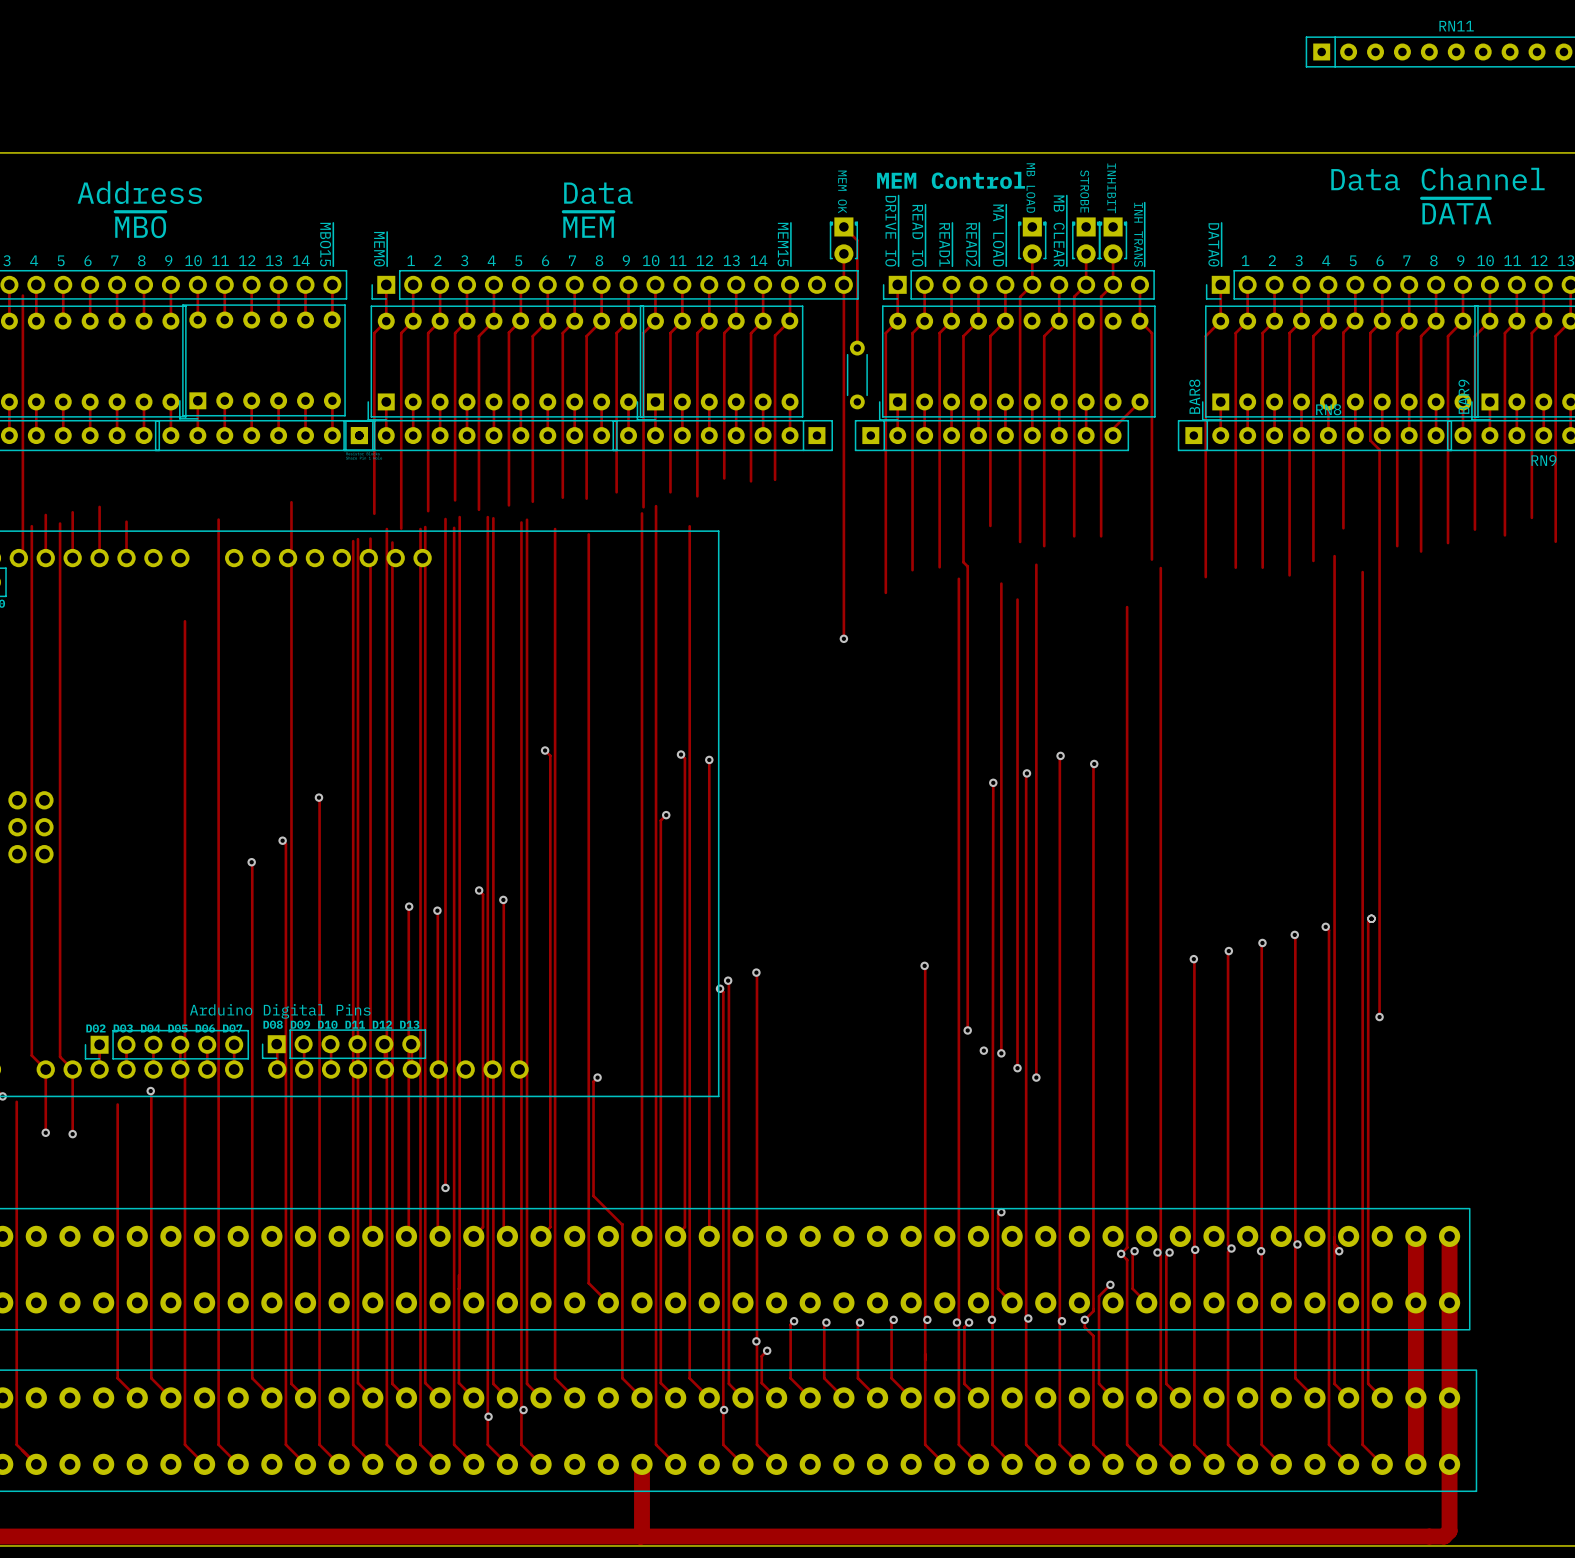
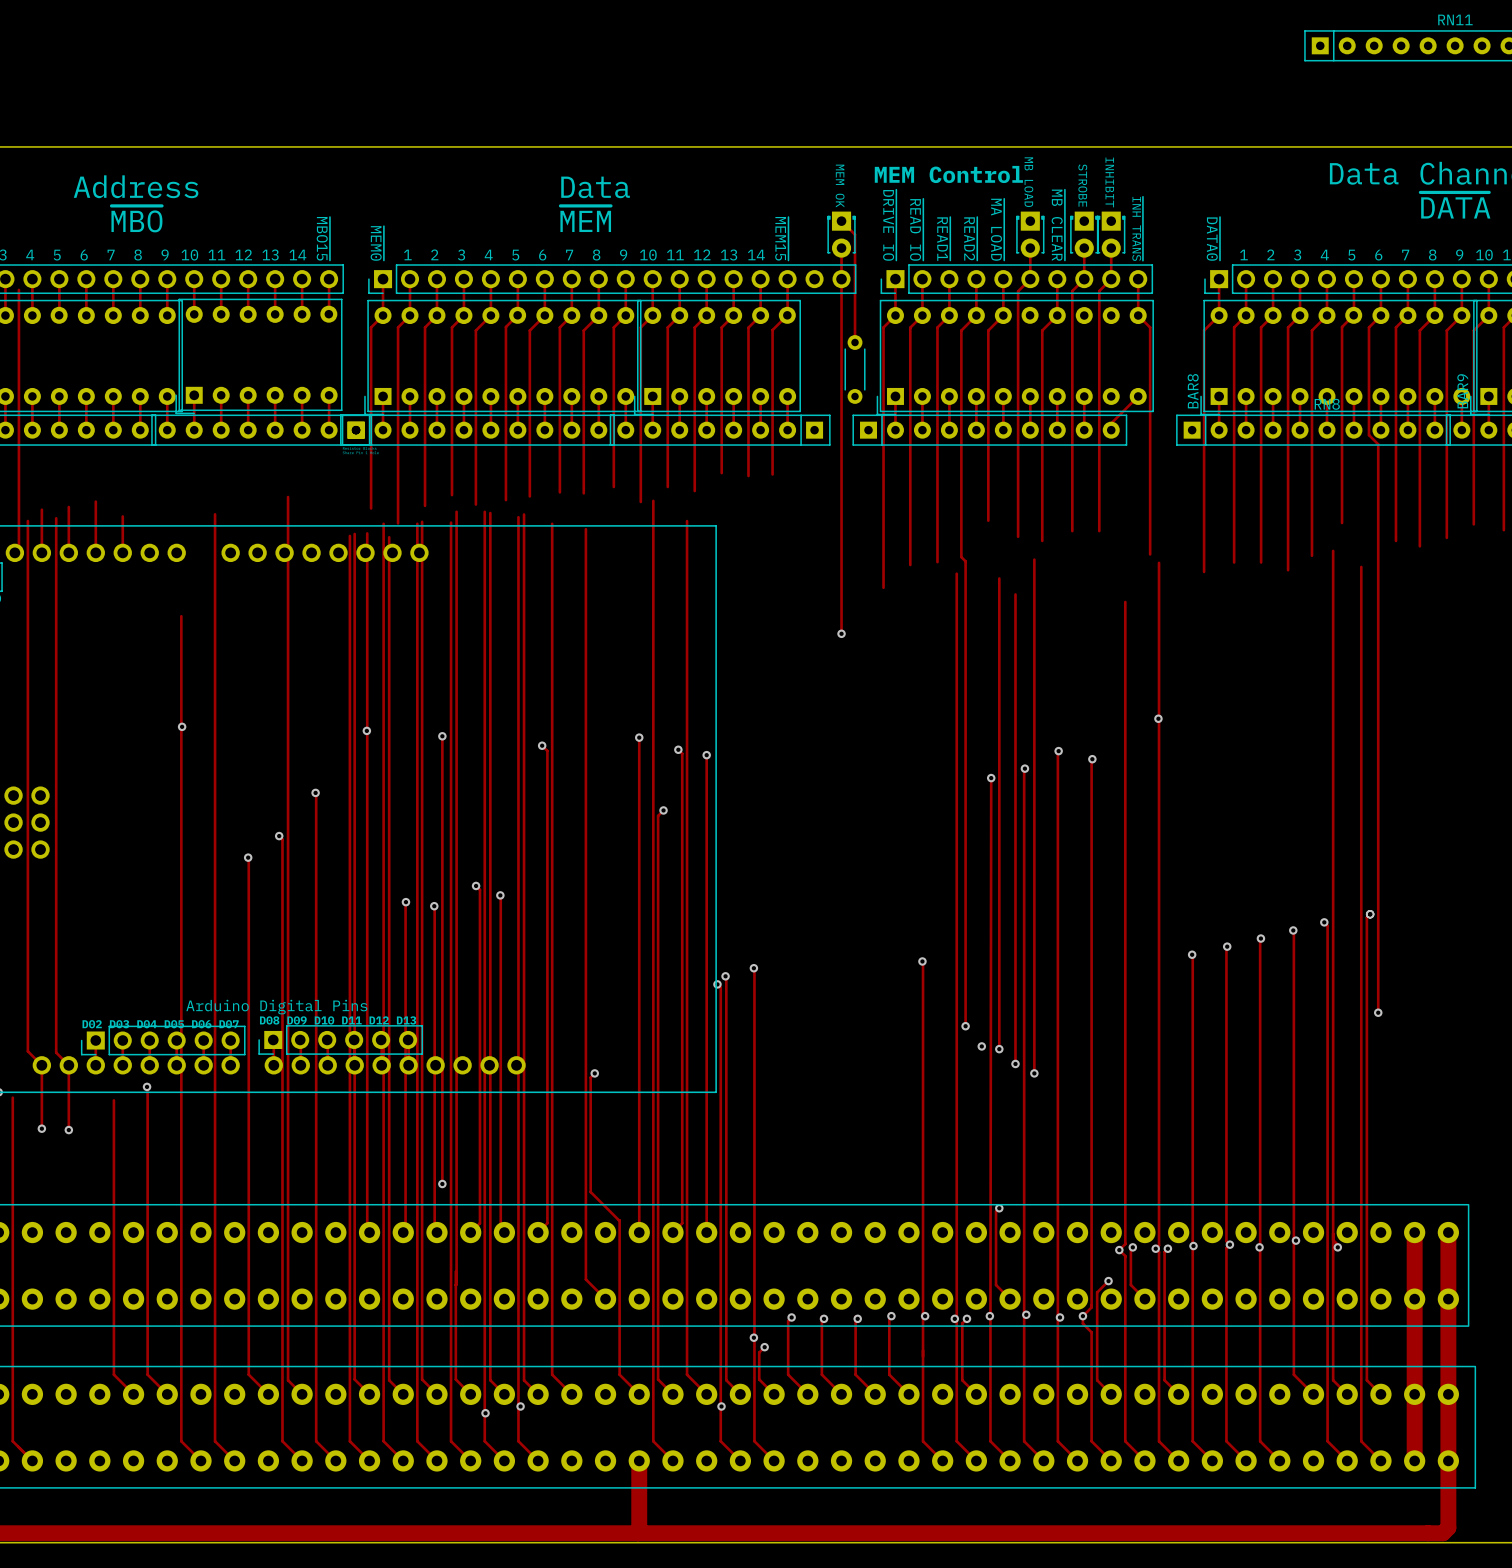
track: (642, 513) (642, 742) -> none
track: (445, 519) (445, 741) -> none
via: none -> (1158, 718)
via: none -> (182, 726)
via: none -> (366, 730)
via: none -> (442, 736)
via: none -> (639, 737)

